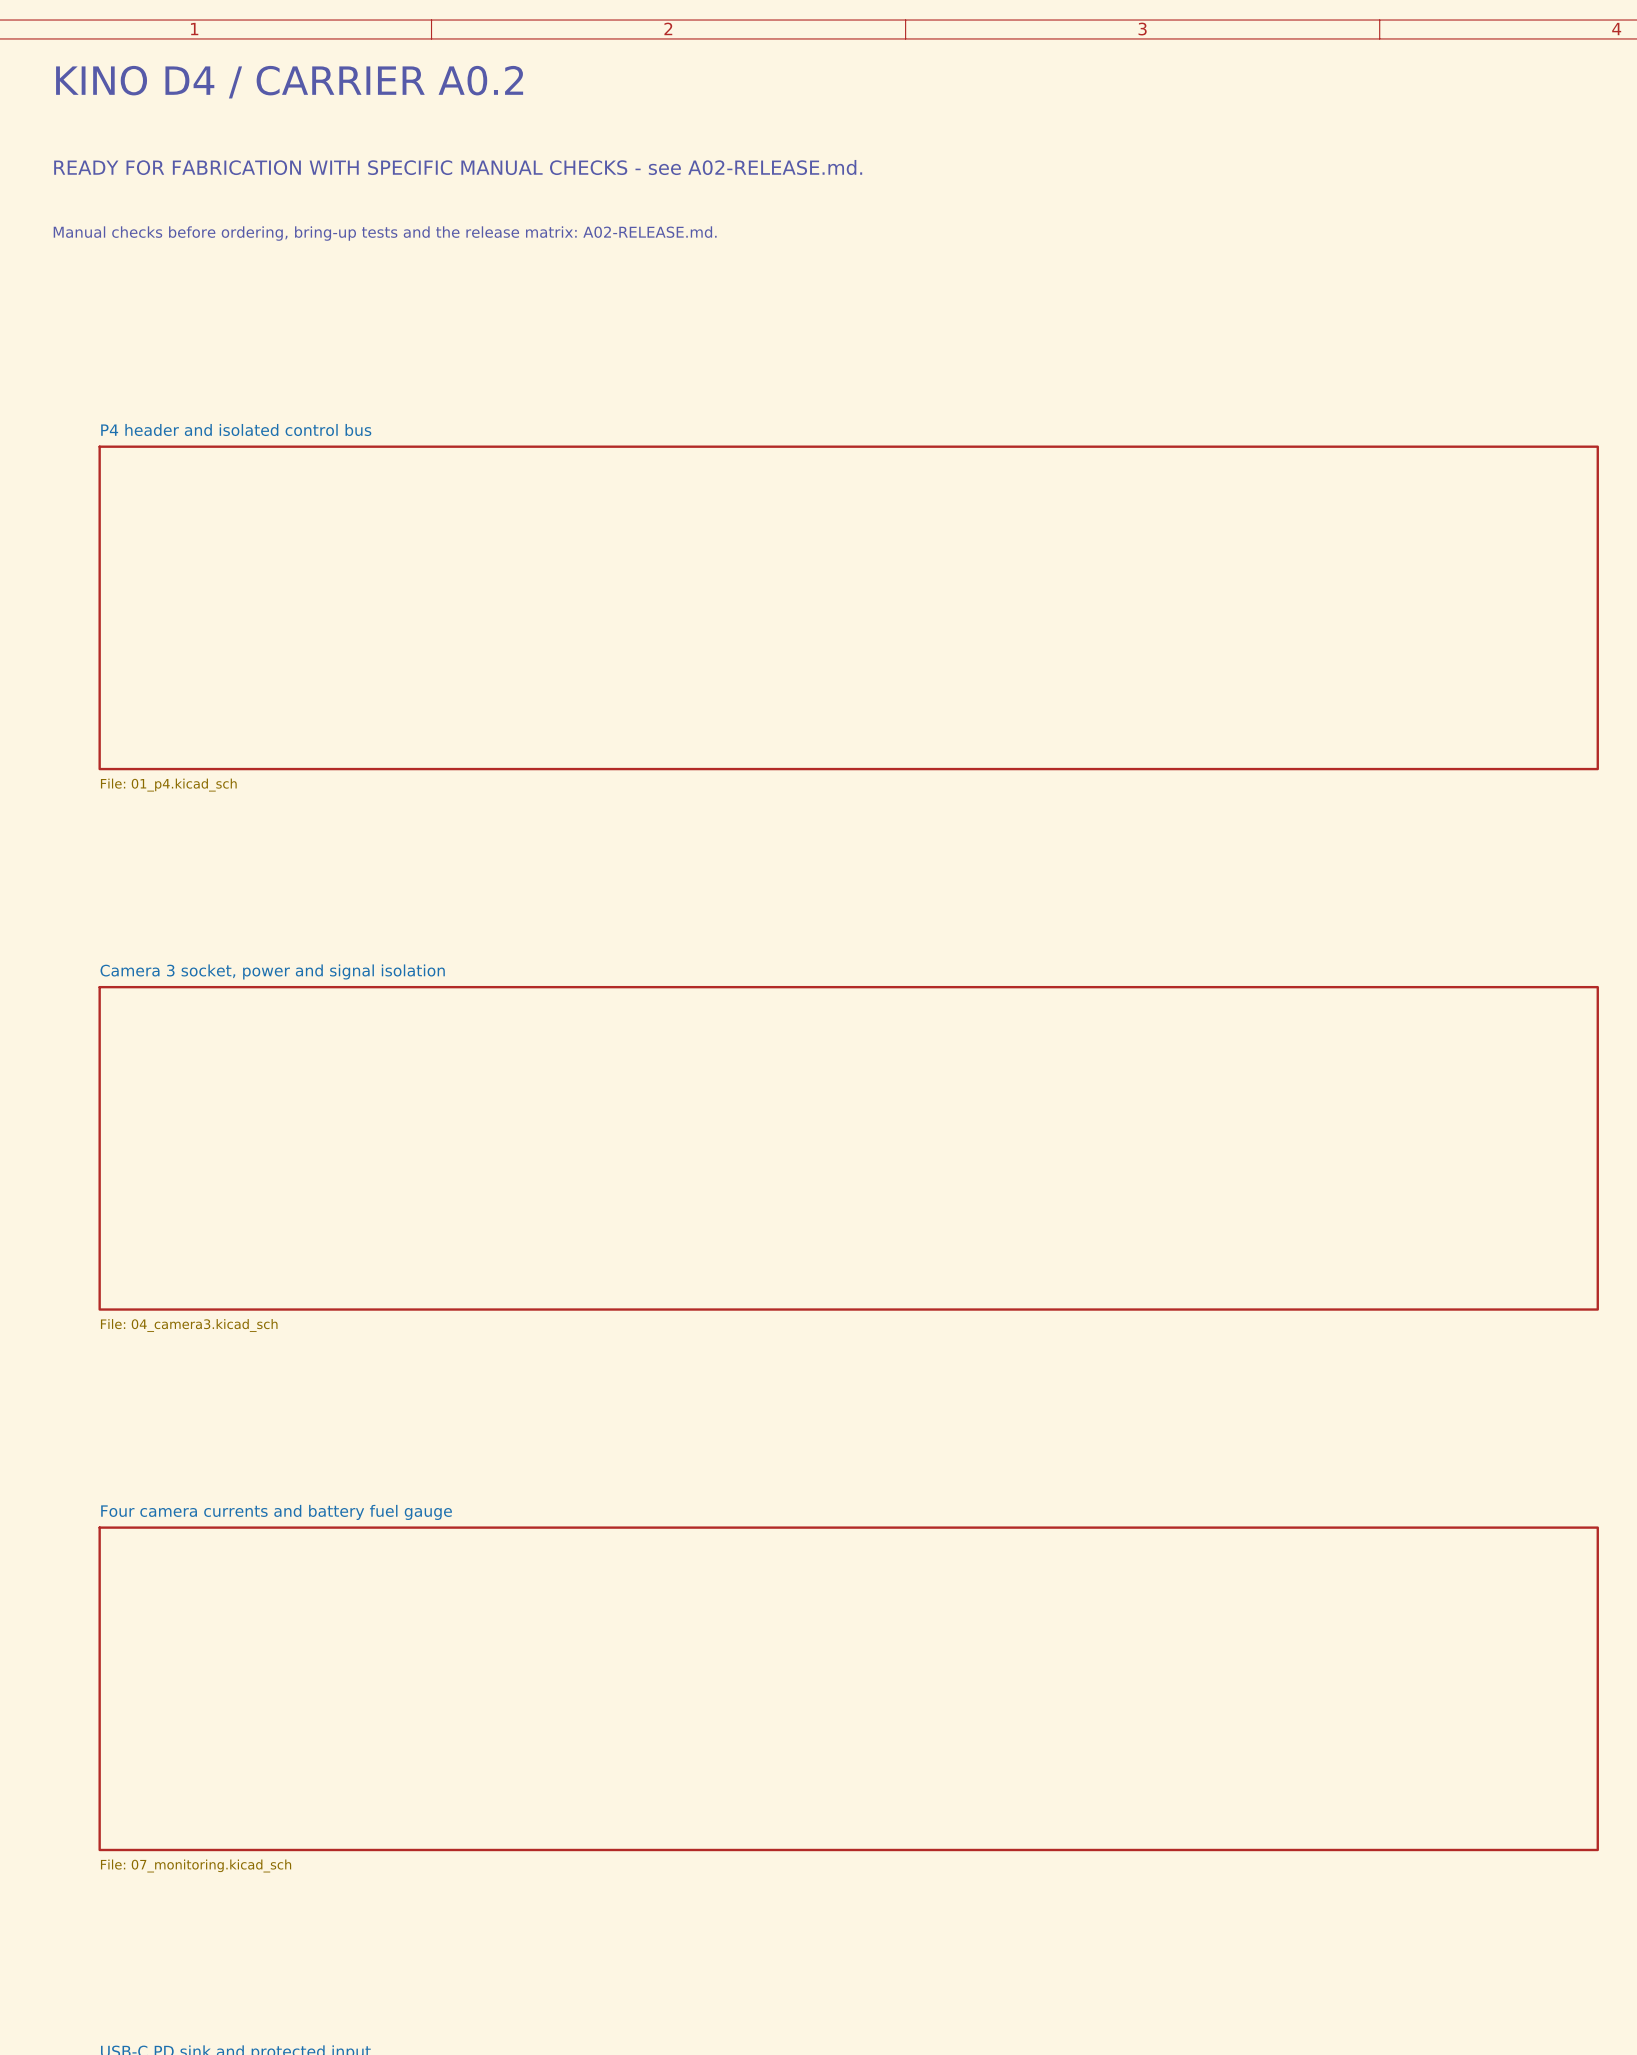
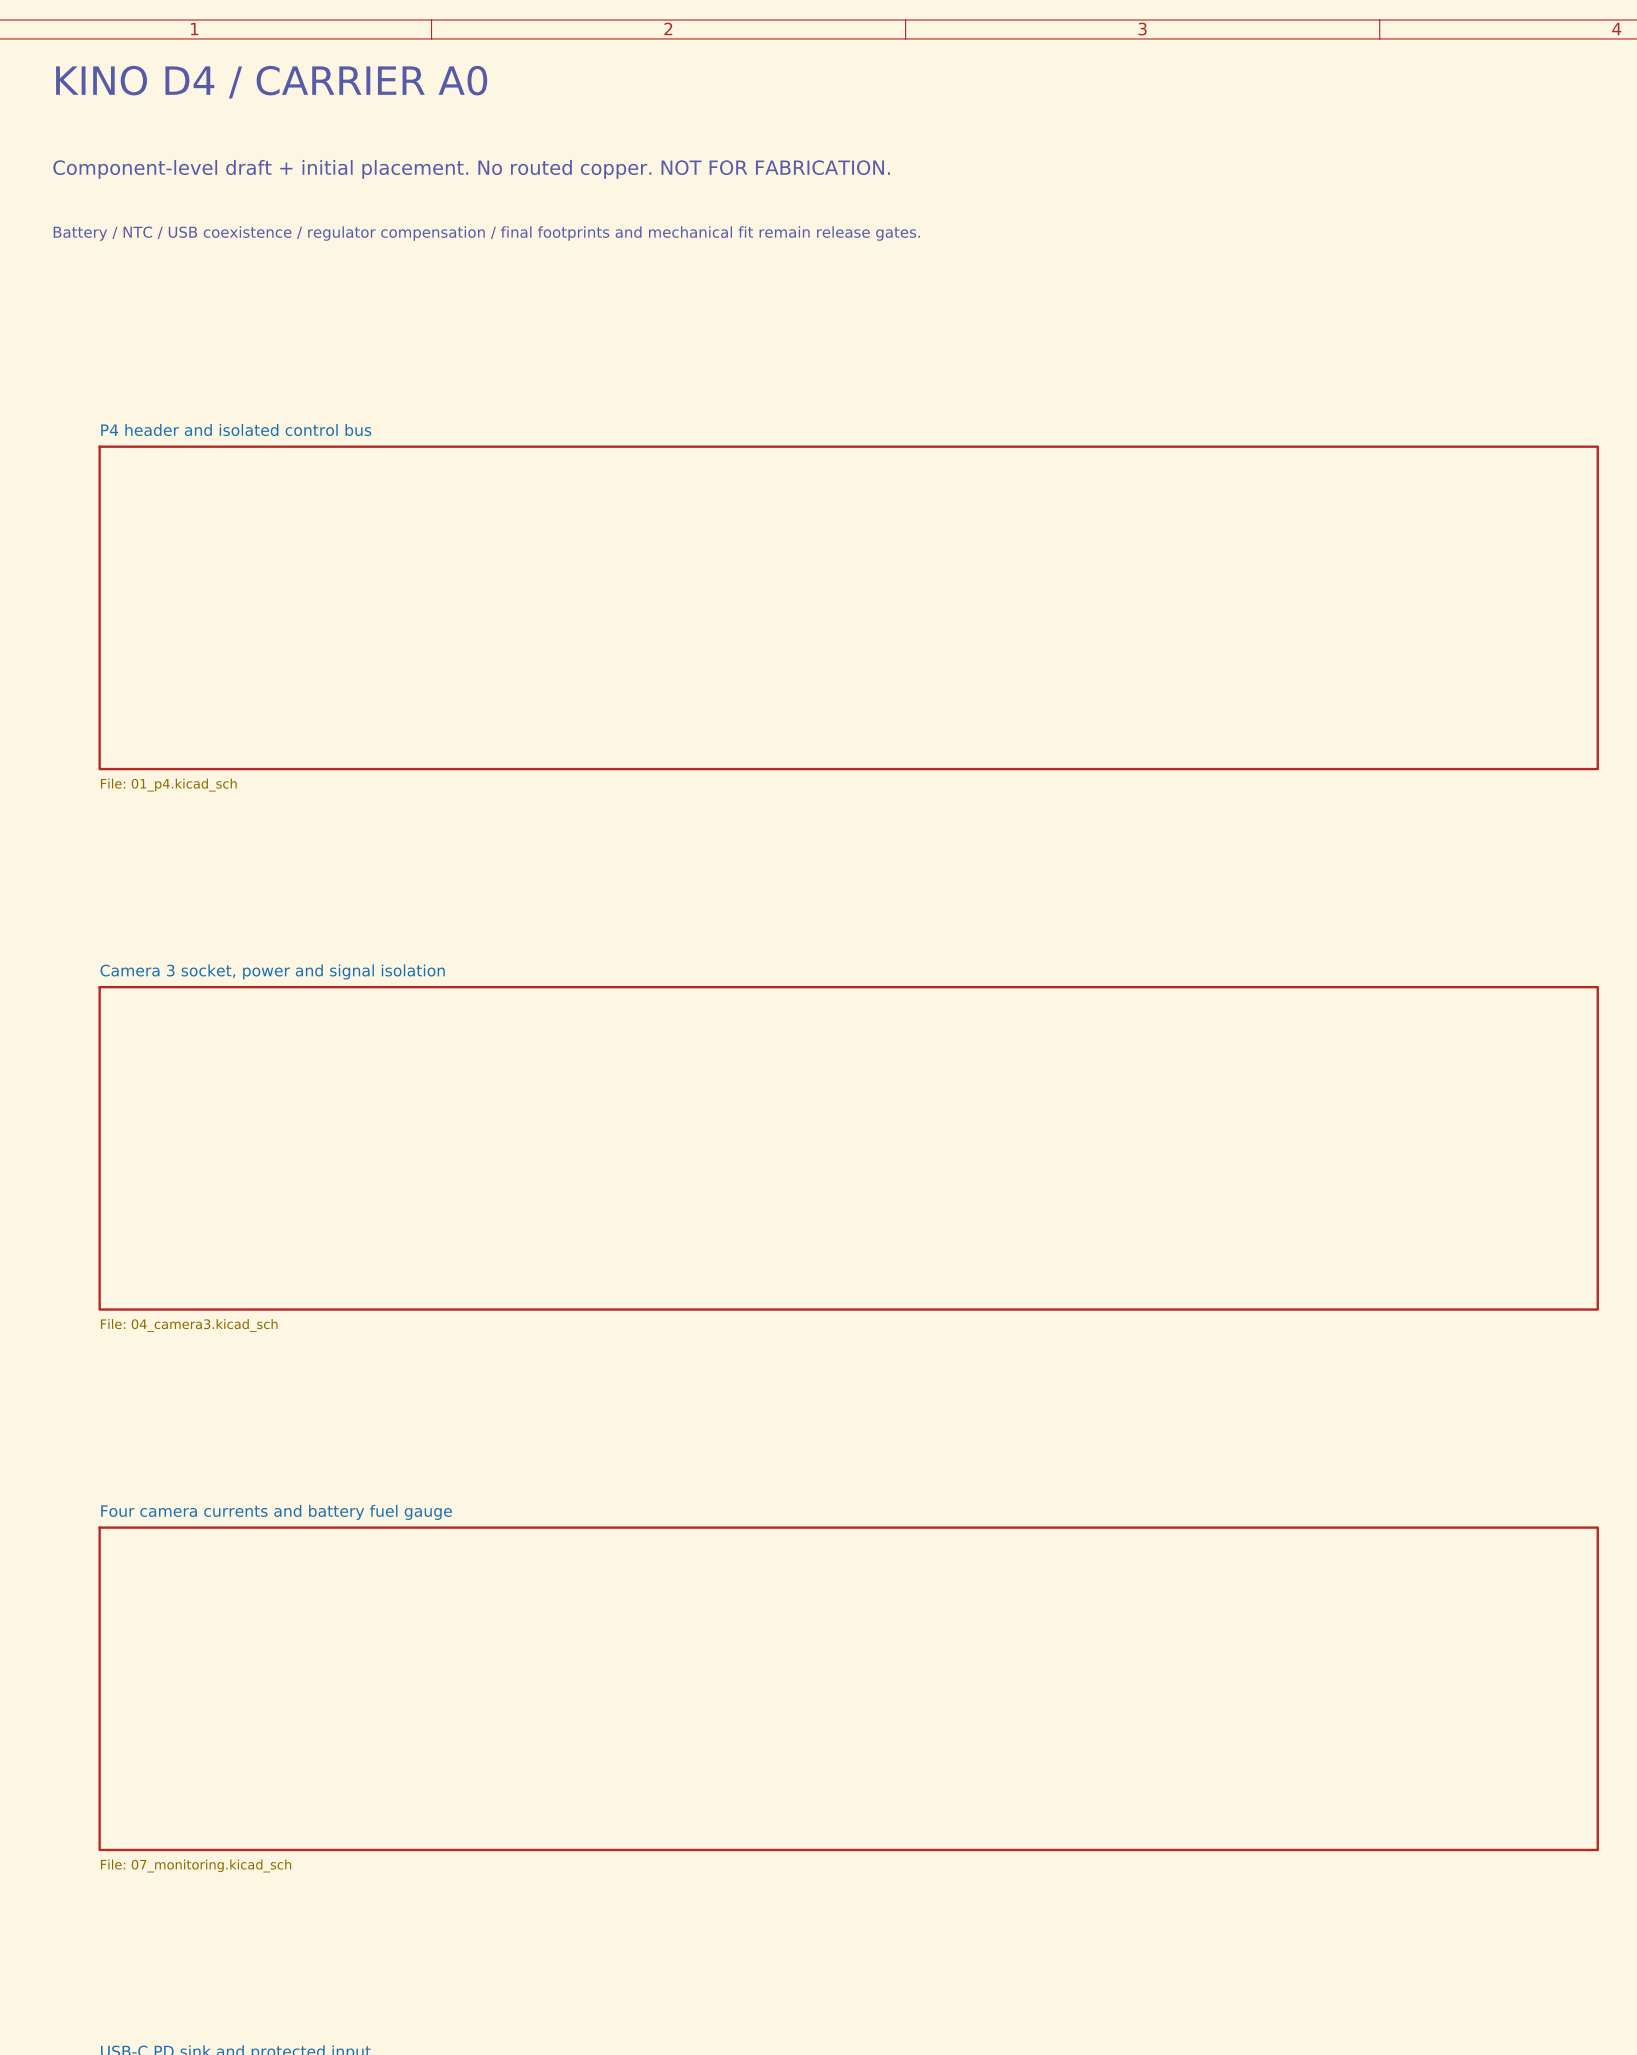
text: KINO D4 / CARRIER A0.2 (289, 82) -> KINO D4 / CARRIER A0 (271, 82)
text: READY FOR FABRICATION WITH SPECIFIC MANUAL CHECKS - see A02-RELEASE.md. (458, 167) -> Component-level draft + initial placement. No routed copper. NOT FOR FABRICATION. (471, 169)
text: Manual checks before ordering, bring-up tests and the release matrix: A02-RELEASE.md. (385, 233) -> Battery / NTC / USB coexistence / regulator compensation / final footprints and mechanical fit remain release gates. (486, 233)

